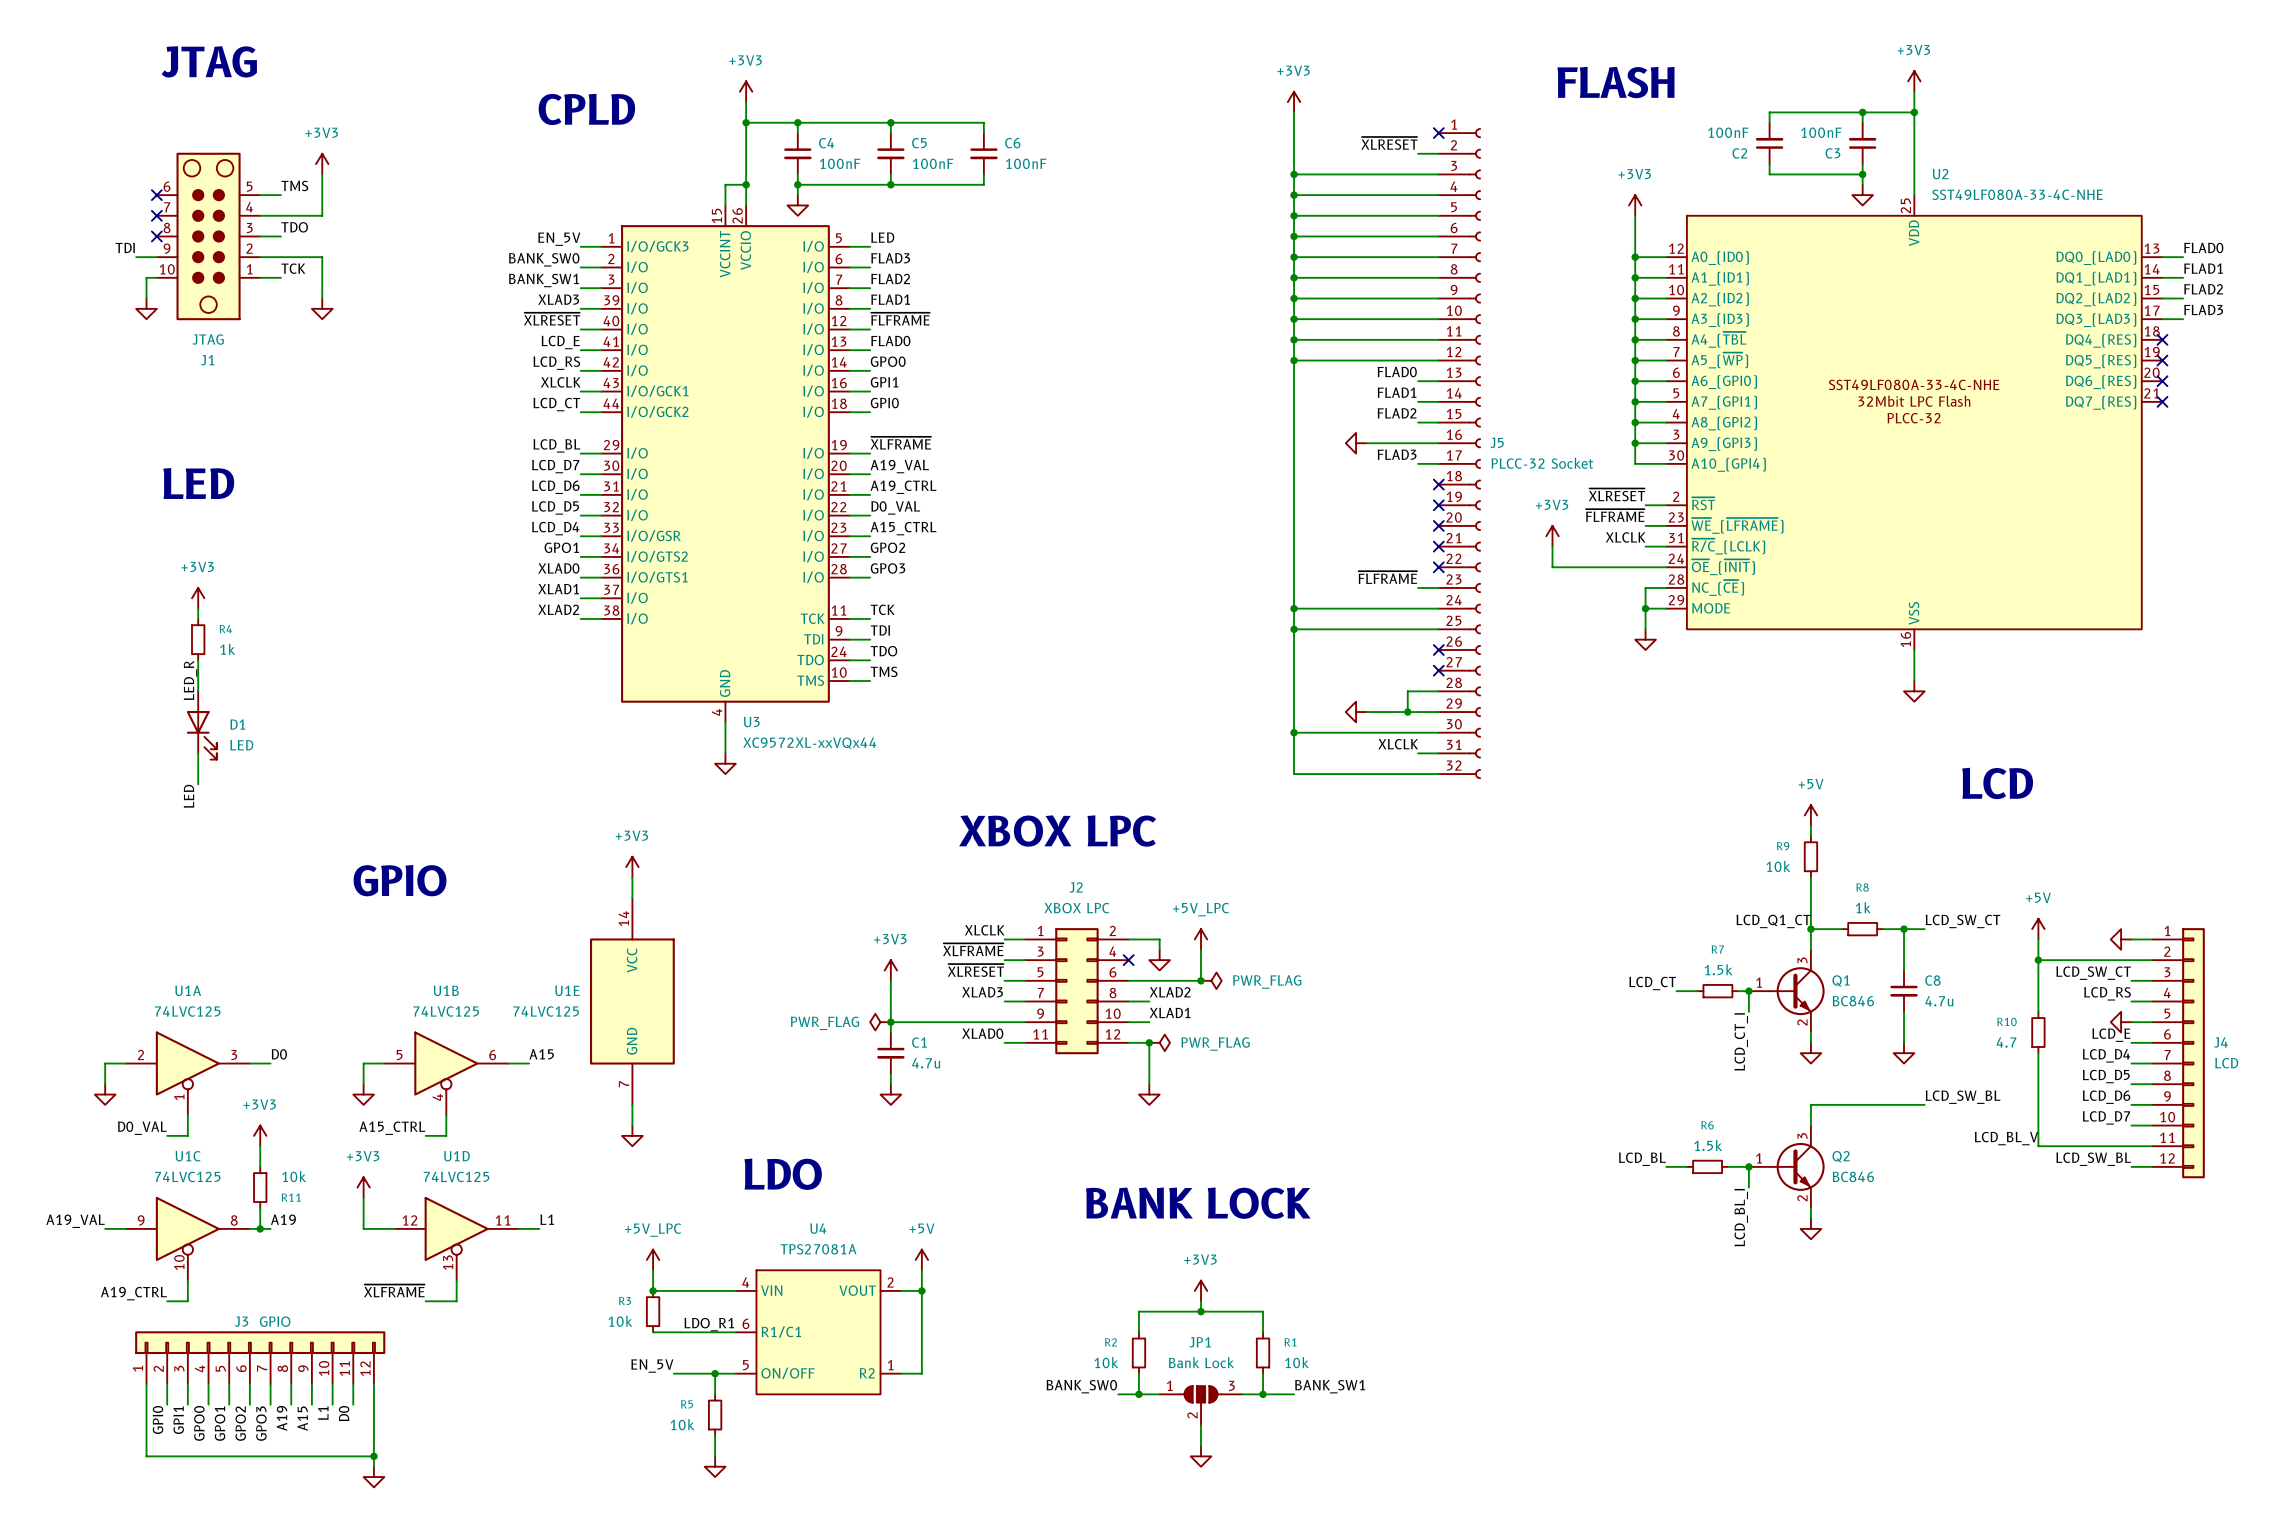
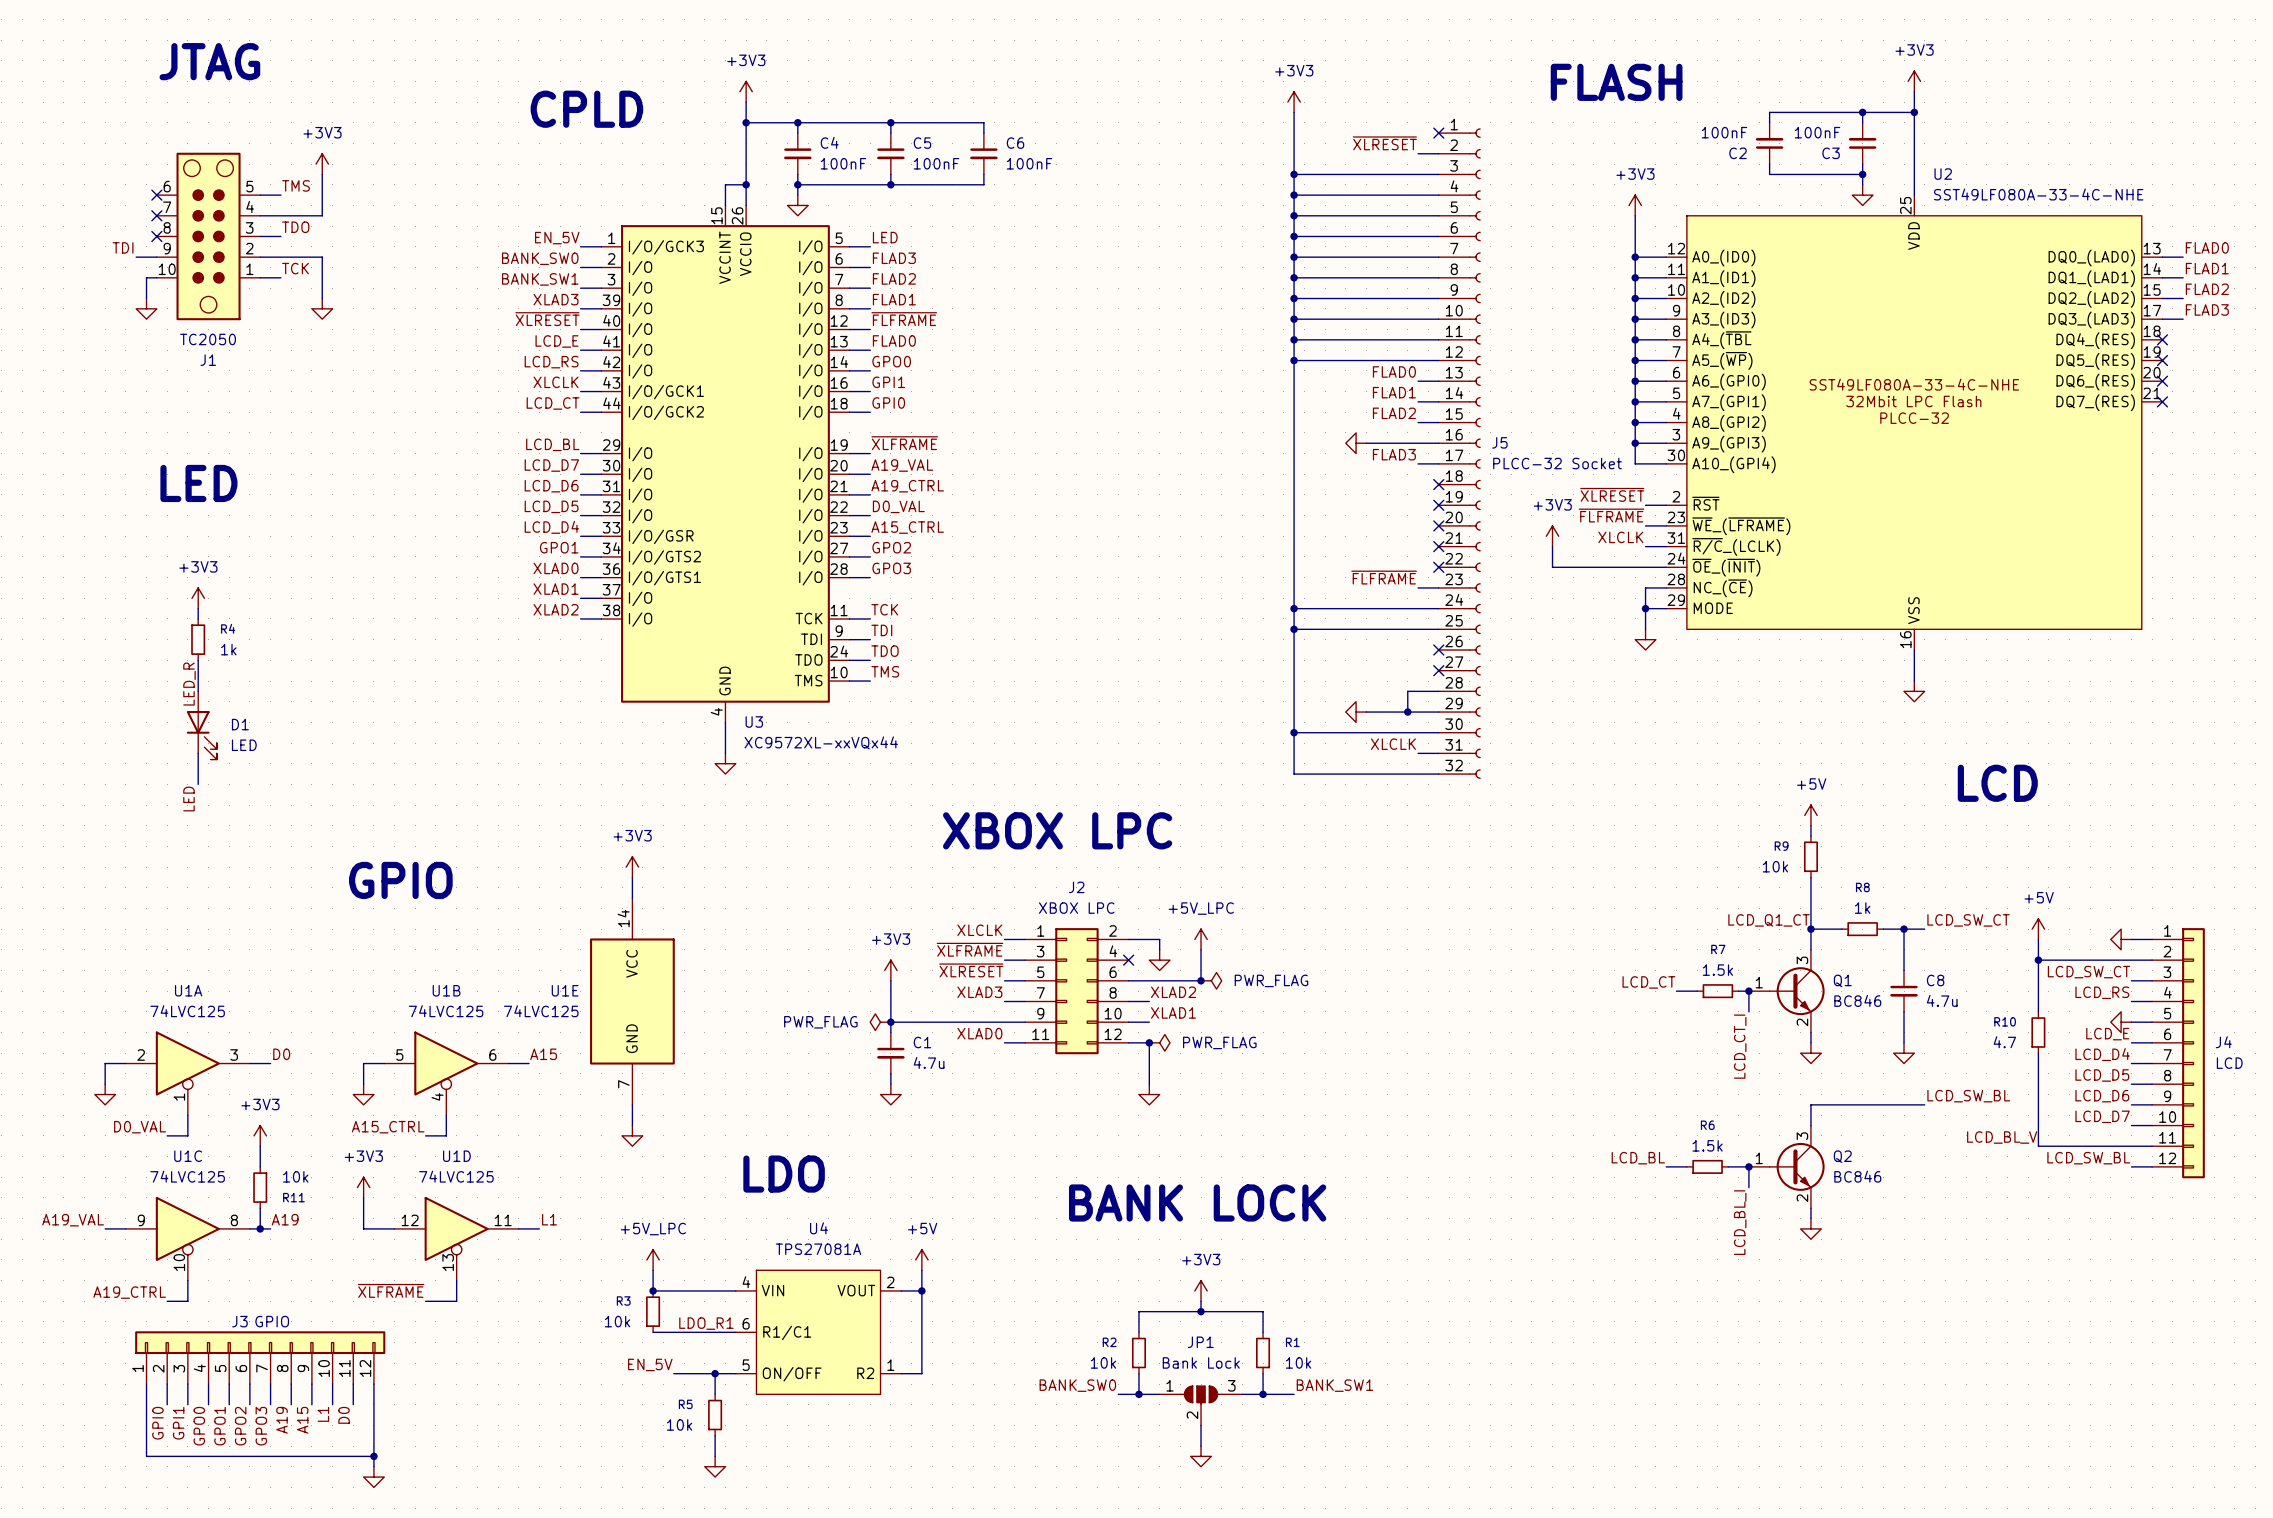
J1 value: JTAG (208, 339) -> TC2050 (208, 339)

